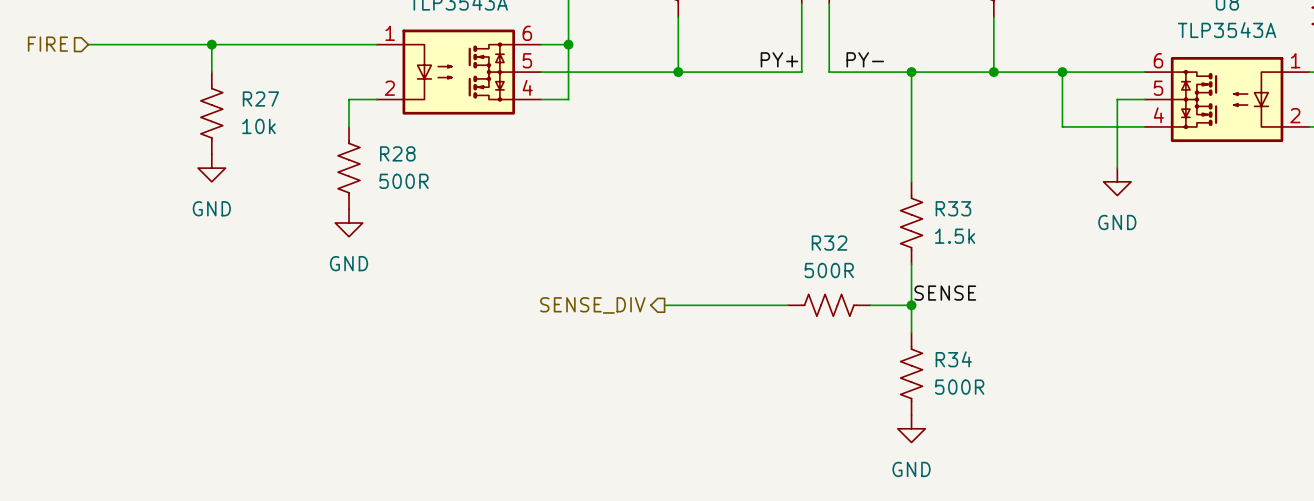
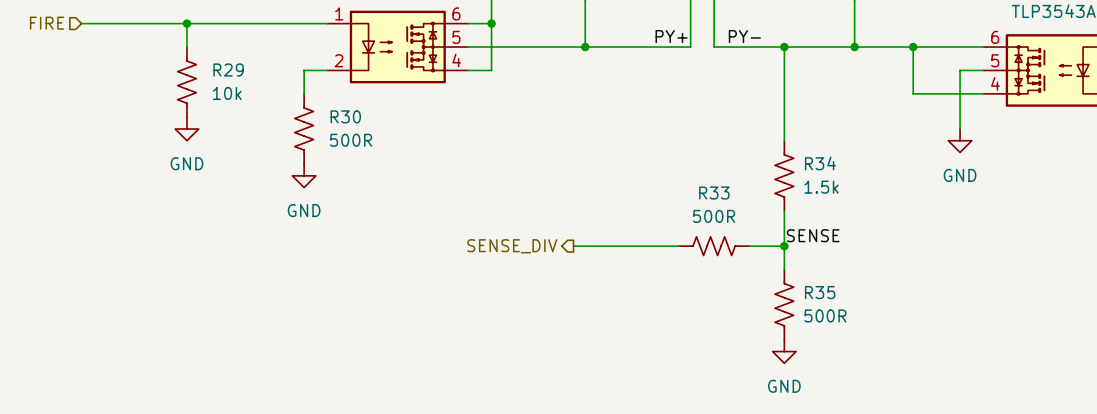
R27 name: R27 (260, 99) -> R29 (228, 70)
R28 name: R28 (397, 153) -> R30 (345, 116)
R33 name: R33 (953, 208) -> R34 (820, 163)
R32 name: R32 (829, 243) -> R33 (714, 193)
R34 name: R34 (953, 359) -> R35 (820, 292)

